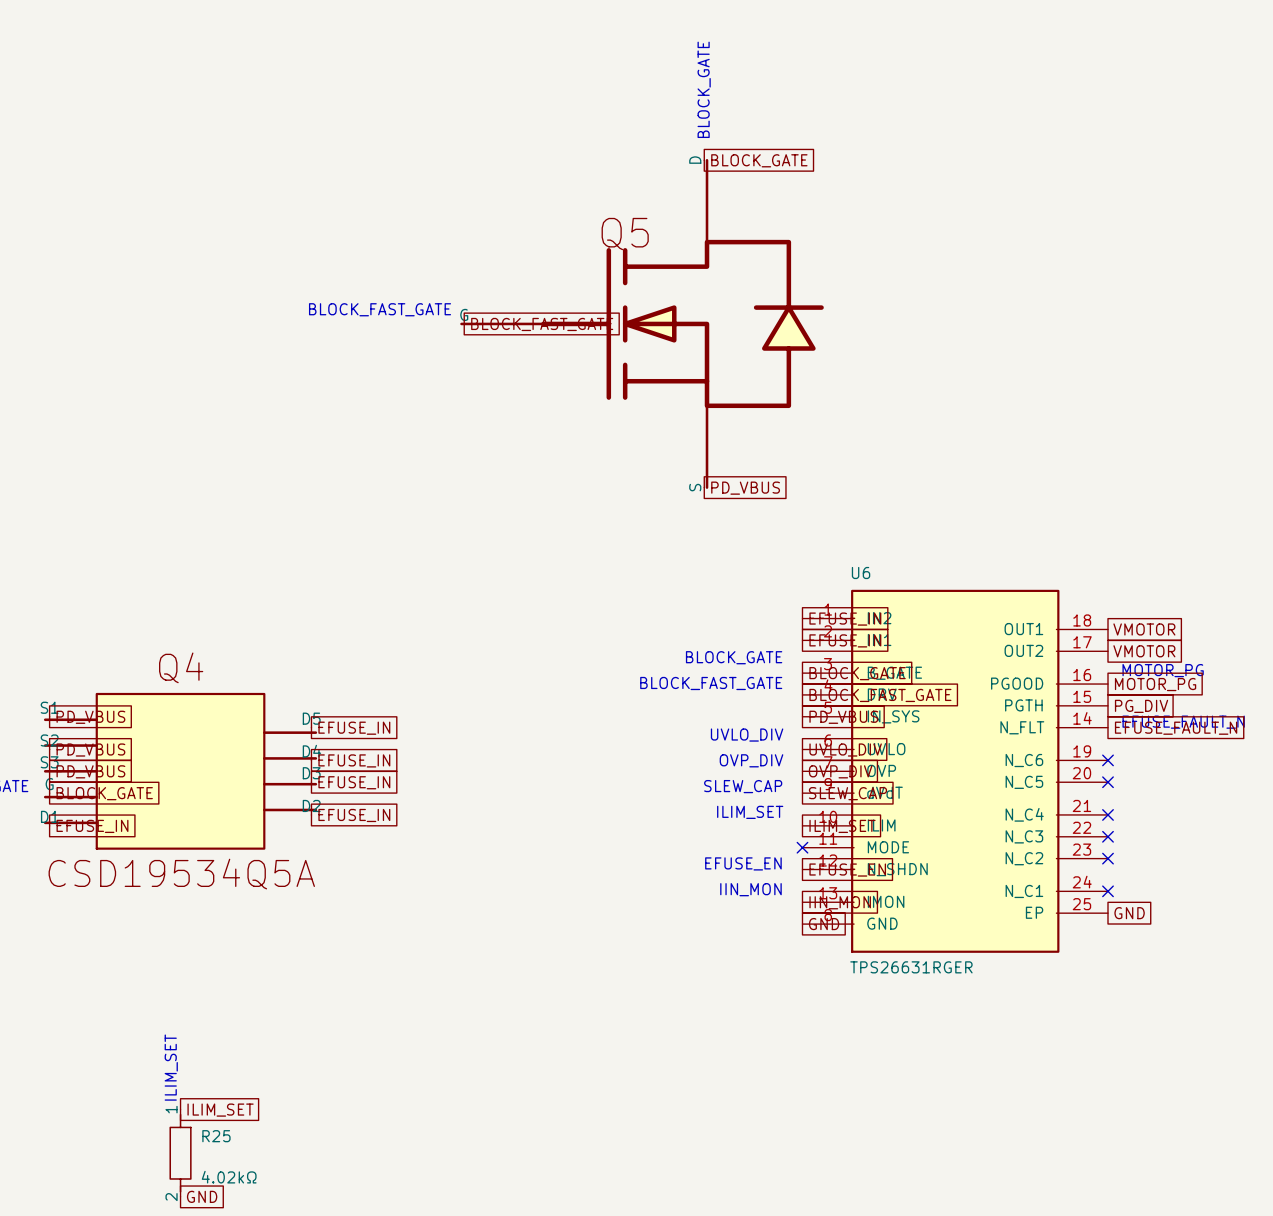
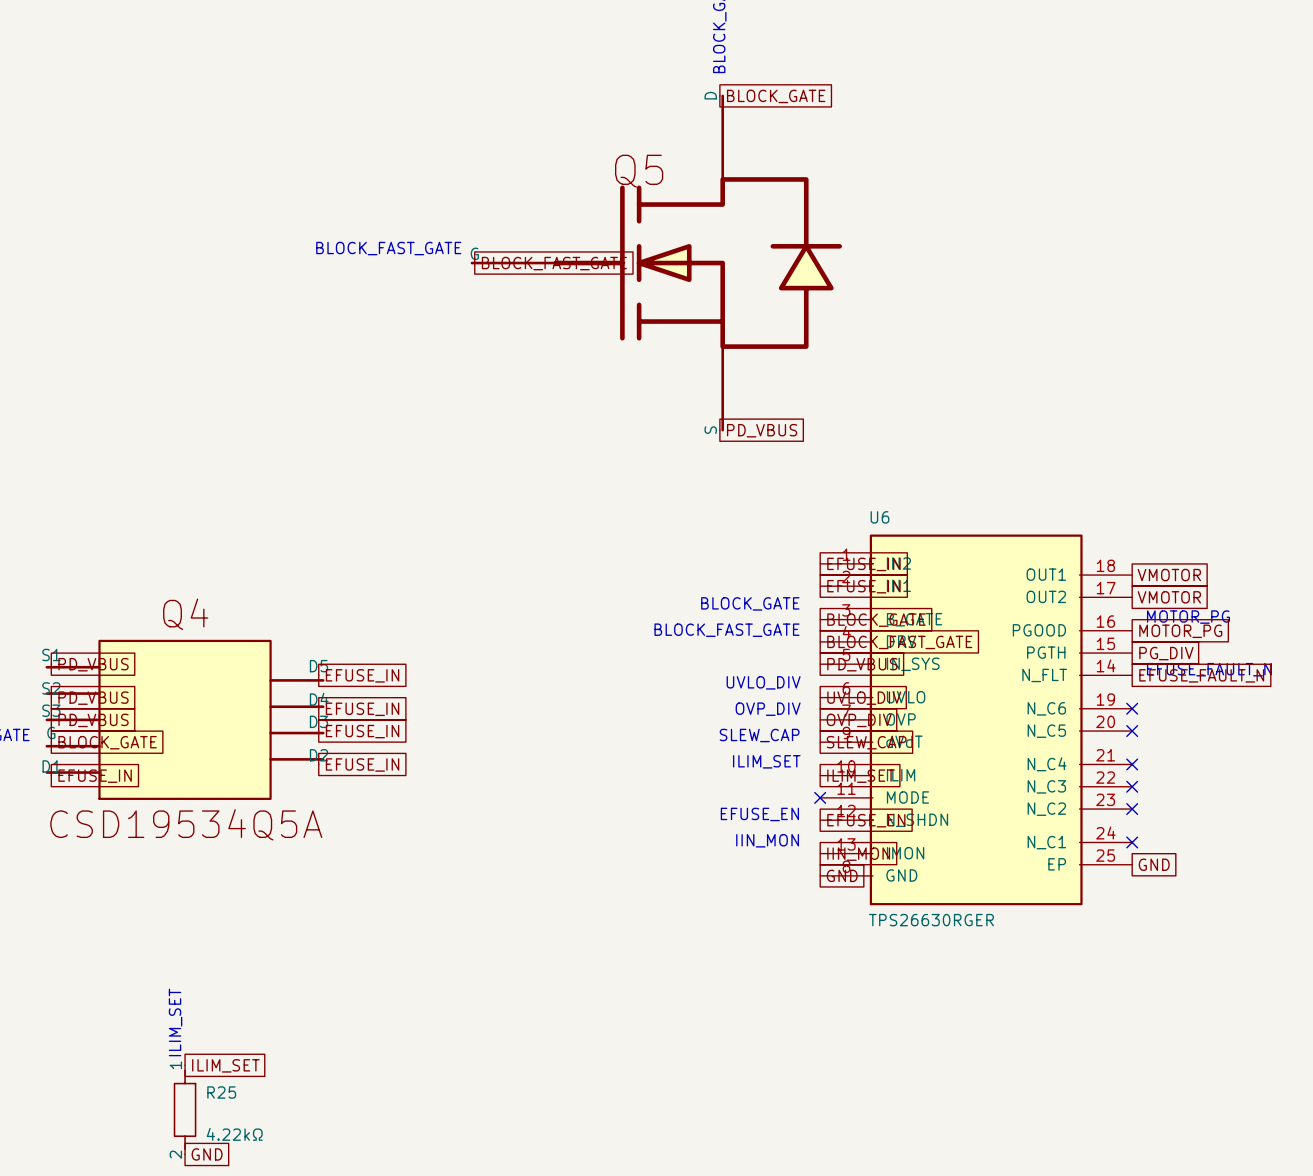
U6 value: TPS26631RGER (911, 967) -> TPS26630RGER (931, 920)
R25 value: 4.02kΩ (229, 1177) -> 4.22kΩ (234, 1134)

